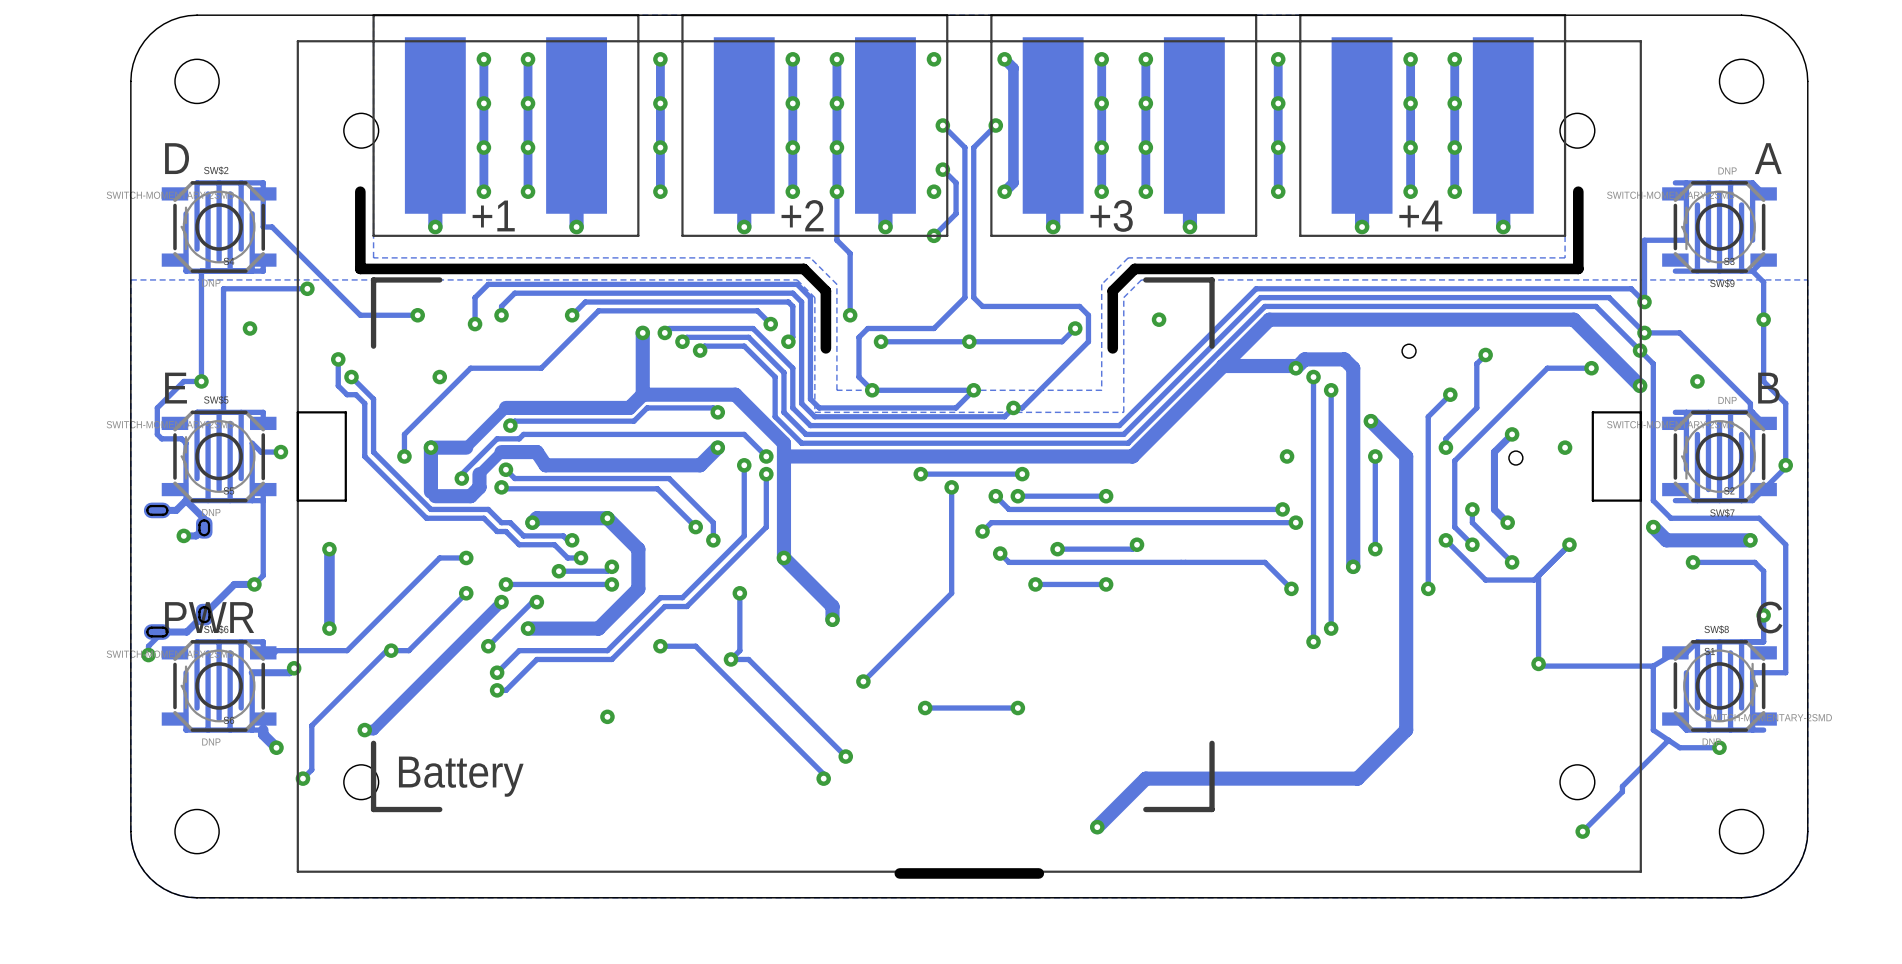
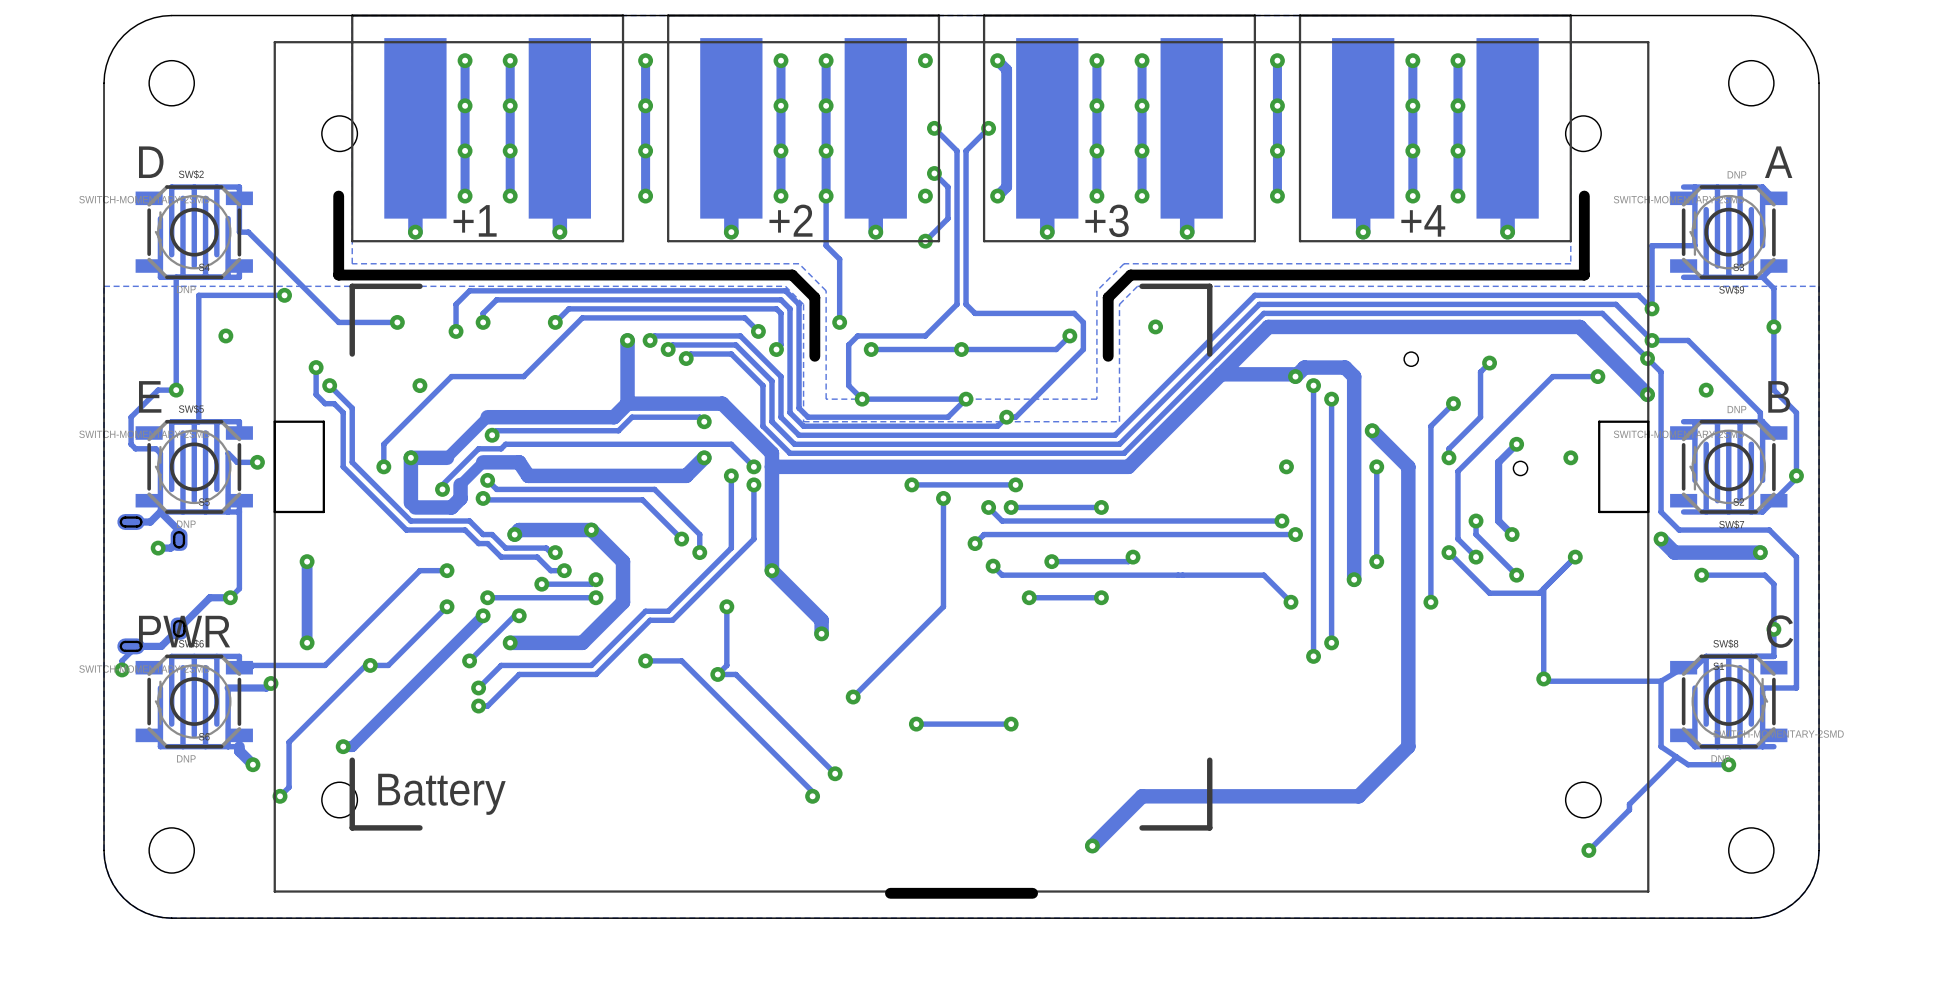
via: (607, 716) -> none

